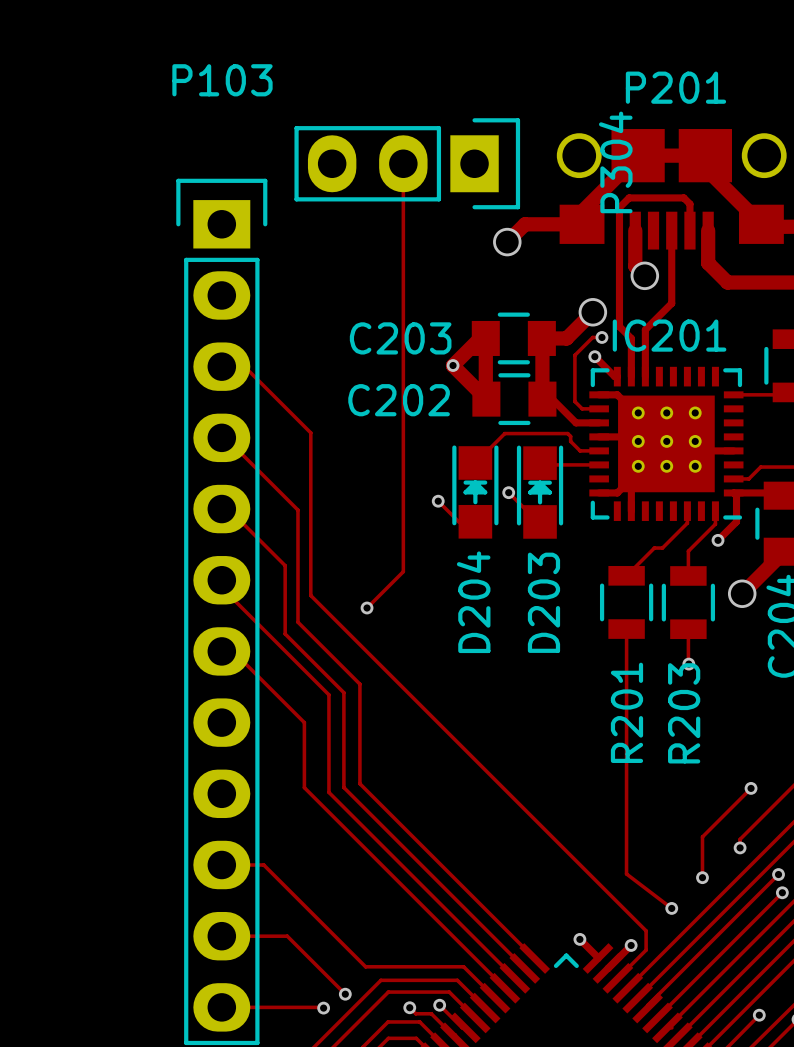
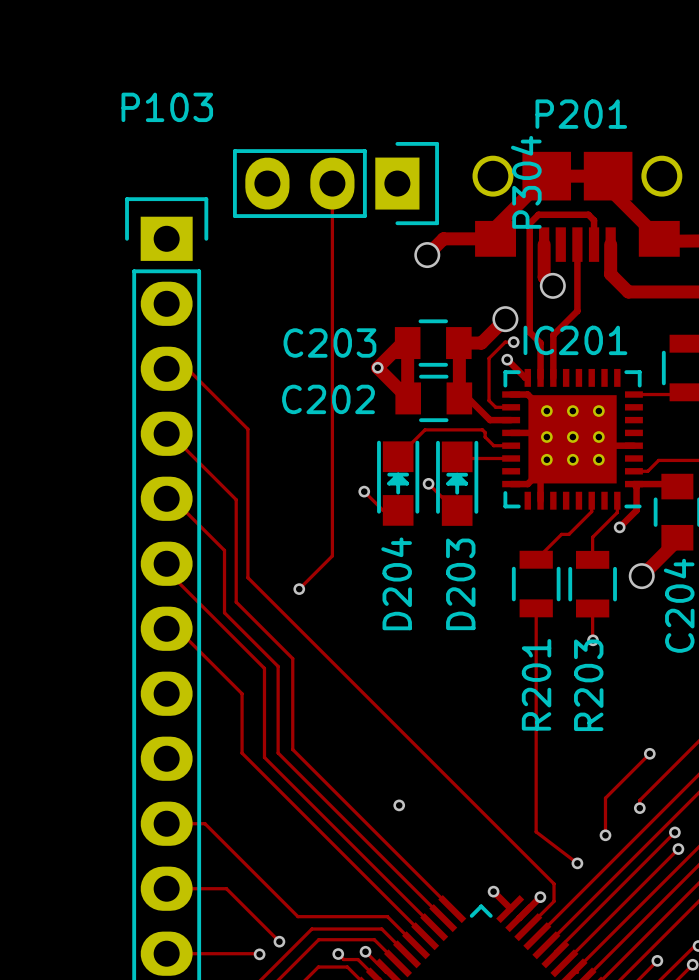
via: none -> (399, 805)

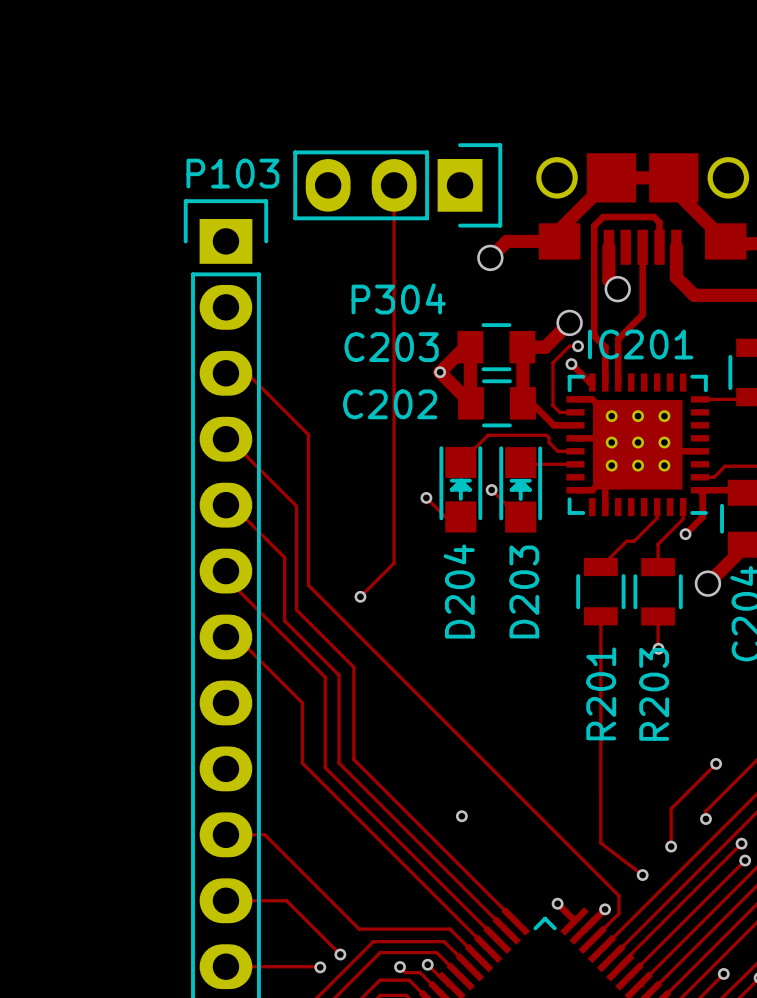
P103 name position: P103 (167, 107) -> P103 (232, 173)
P201 name: P201 (581, 114) -> none
P304 name rotation: 0° (526, 182) -> 90° clockwise (398, 298)
P304 name position: P304 (526, 182) -> P304 (398, 298)

